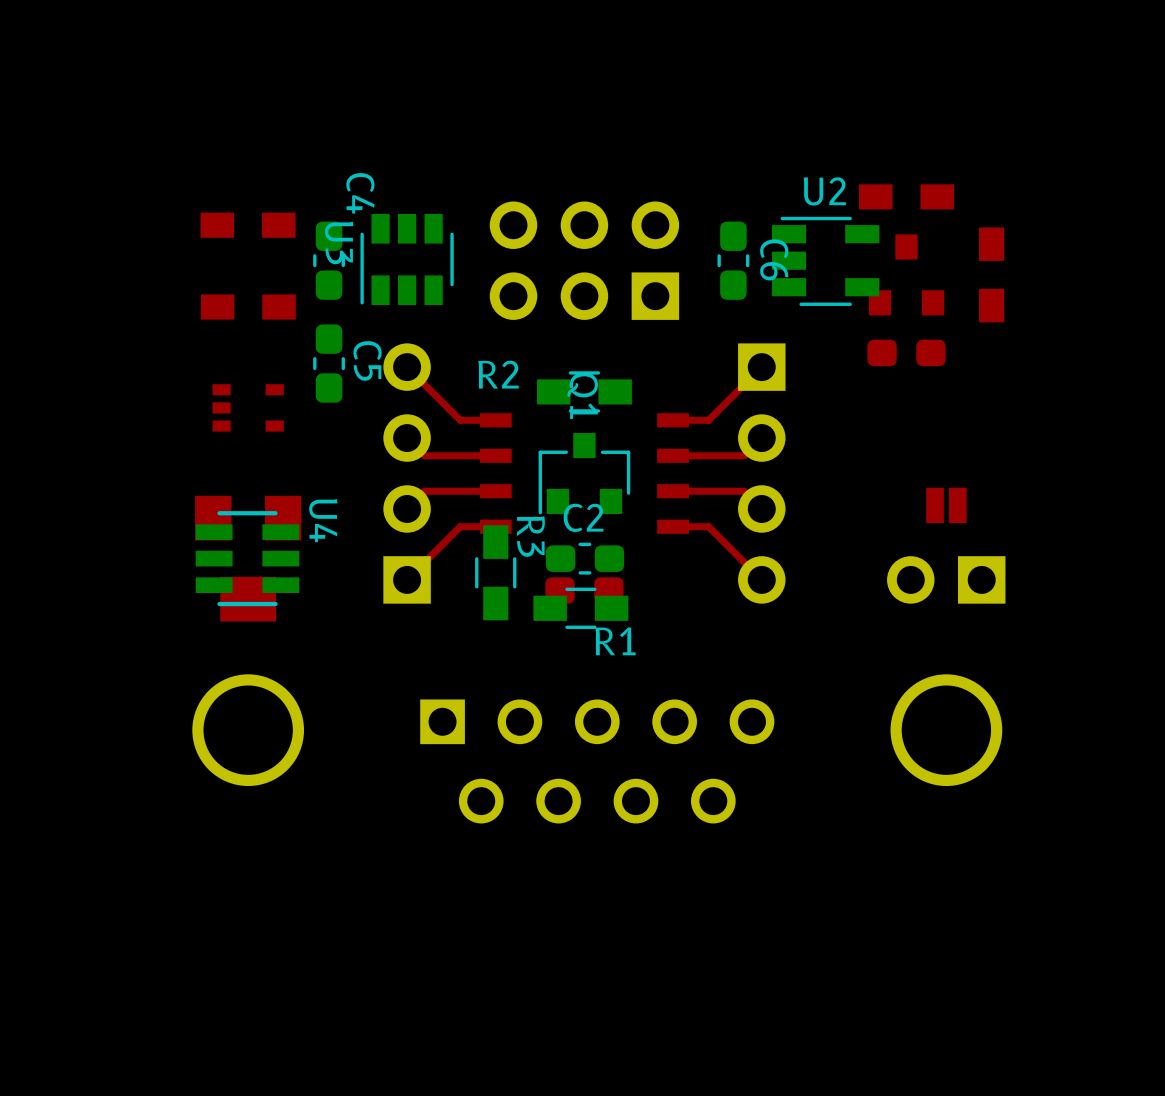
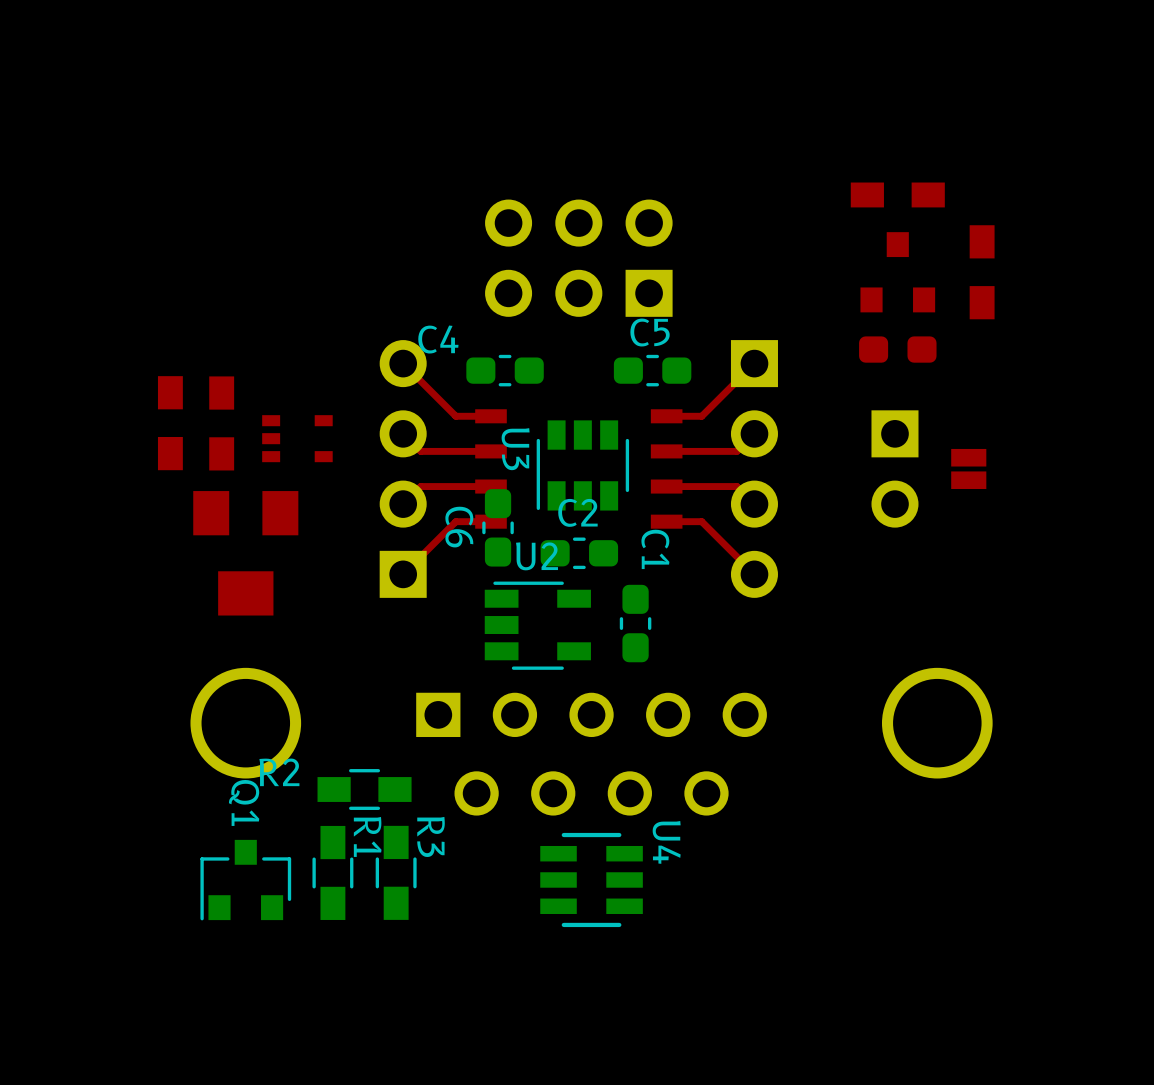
C4 name position: C4 (360, 193) -> C4 (438, 339)
part: (248, 225) -> none
U3 position: (407, 259) -> (582, 465)
C6 name position: C6 (774, 259) -> C6 (459, 527)
C4 rotation: 0° (329, 260) -> 90° clockwise (505, 370)
C4 position: (329, 260) -> (505, 370)
C6 position: (733, 260) -> (498, 527)
U2 position: (825, 261) -> (537, 625)
part: (248, 307) -> none
C5 rotation: 0° (329, 363) -> 90° clockwise (652, 370)
C5 position: (329, 363) -> (652, 370)
R2 position: (584, 391) -> (364, 789)
part position: (248, 407) -> (297, 438)
part: none -> (170, 423)
part: none -> (221, 423)
Q1 position: (584, 473) -> (245, 880)
part rotation: 0° (946, 505) -> 90° clockwise (968, 468)
part position: (946, 505) -> (968, 468)
U4 position: (247, 558) -> (591, 879)
R3 position: (495, 572) -> (396, 872)
part rotation: 0° (946, 579) -> 90° counterclockwise (894, 468)
part position: (946, 579) -> (894, 468)
C1 side: top (584, 590) -> bottom (635, 623)
R1 rotation: 0° (580, 608) -> 90° clockwise (332, 872)
R1 position: (580, 608) -> (332, 872)
R1 name position: R1 (615, 641) -> R1 (367, 836)

